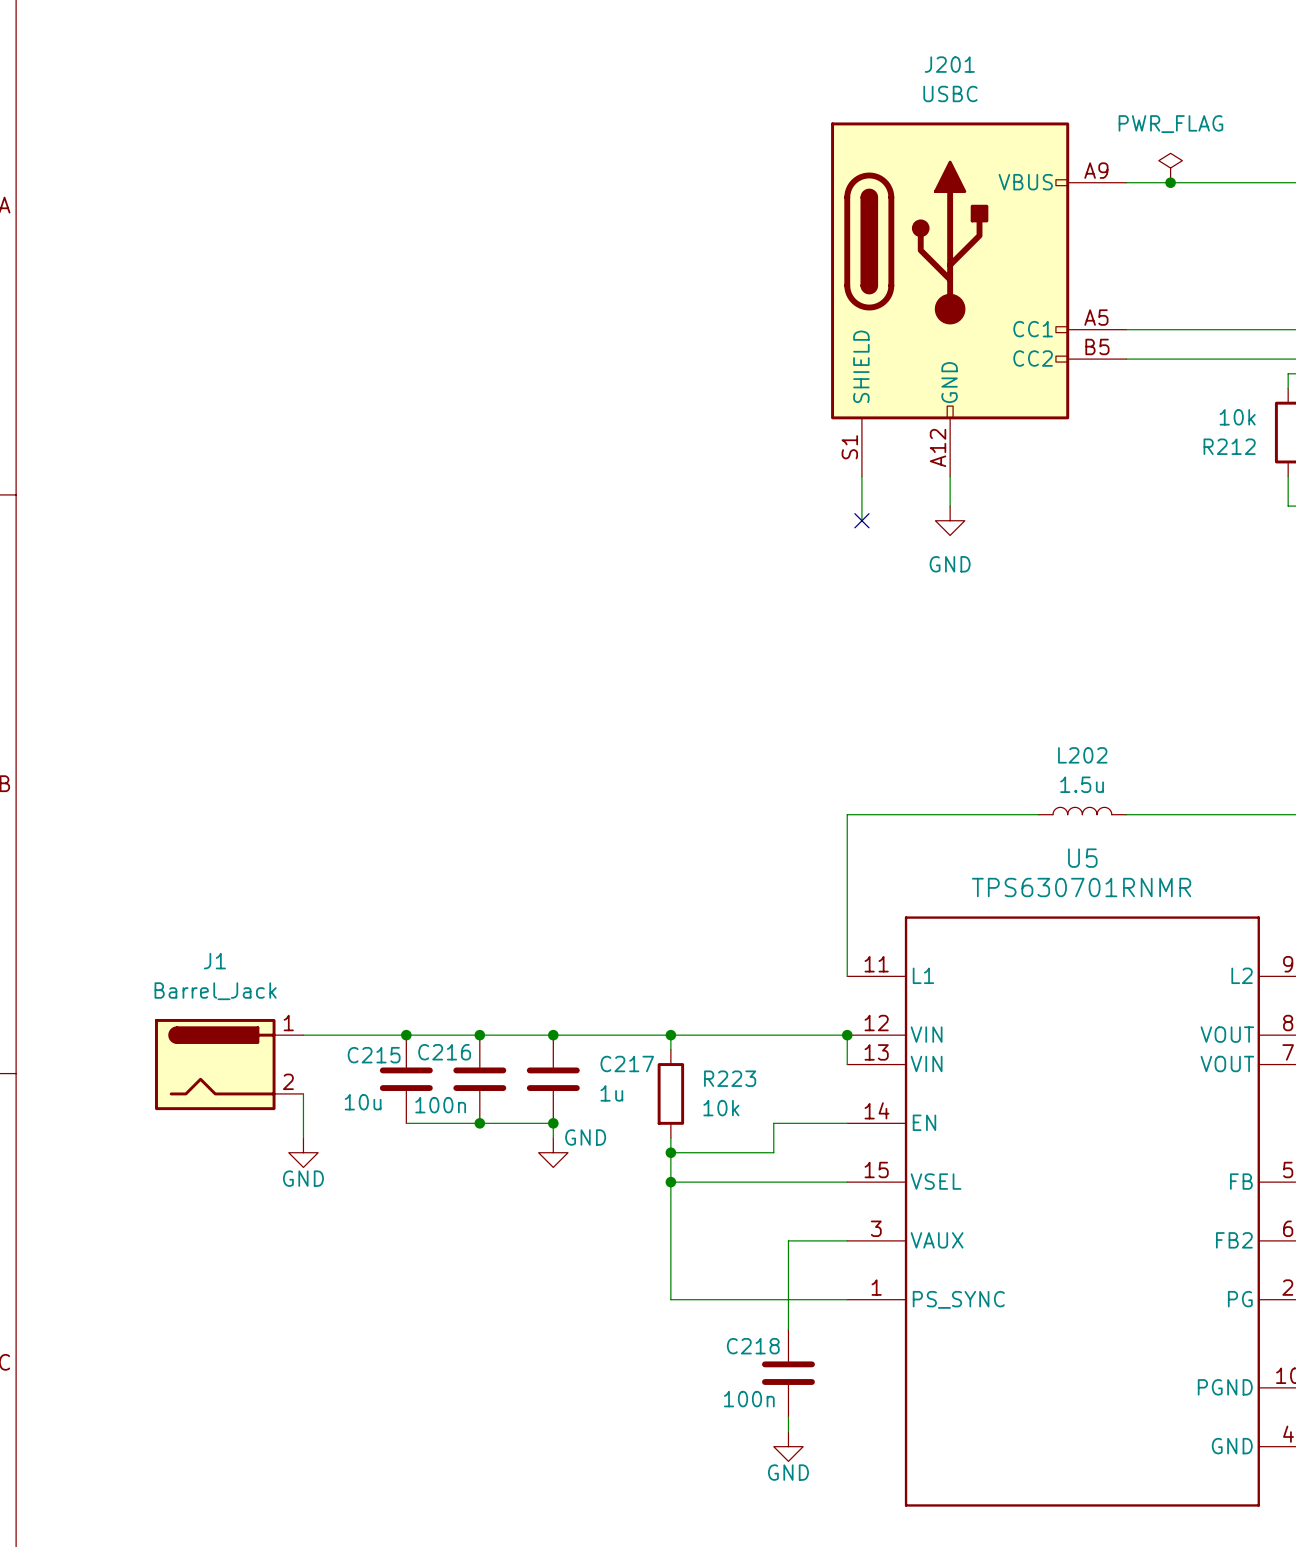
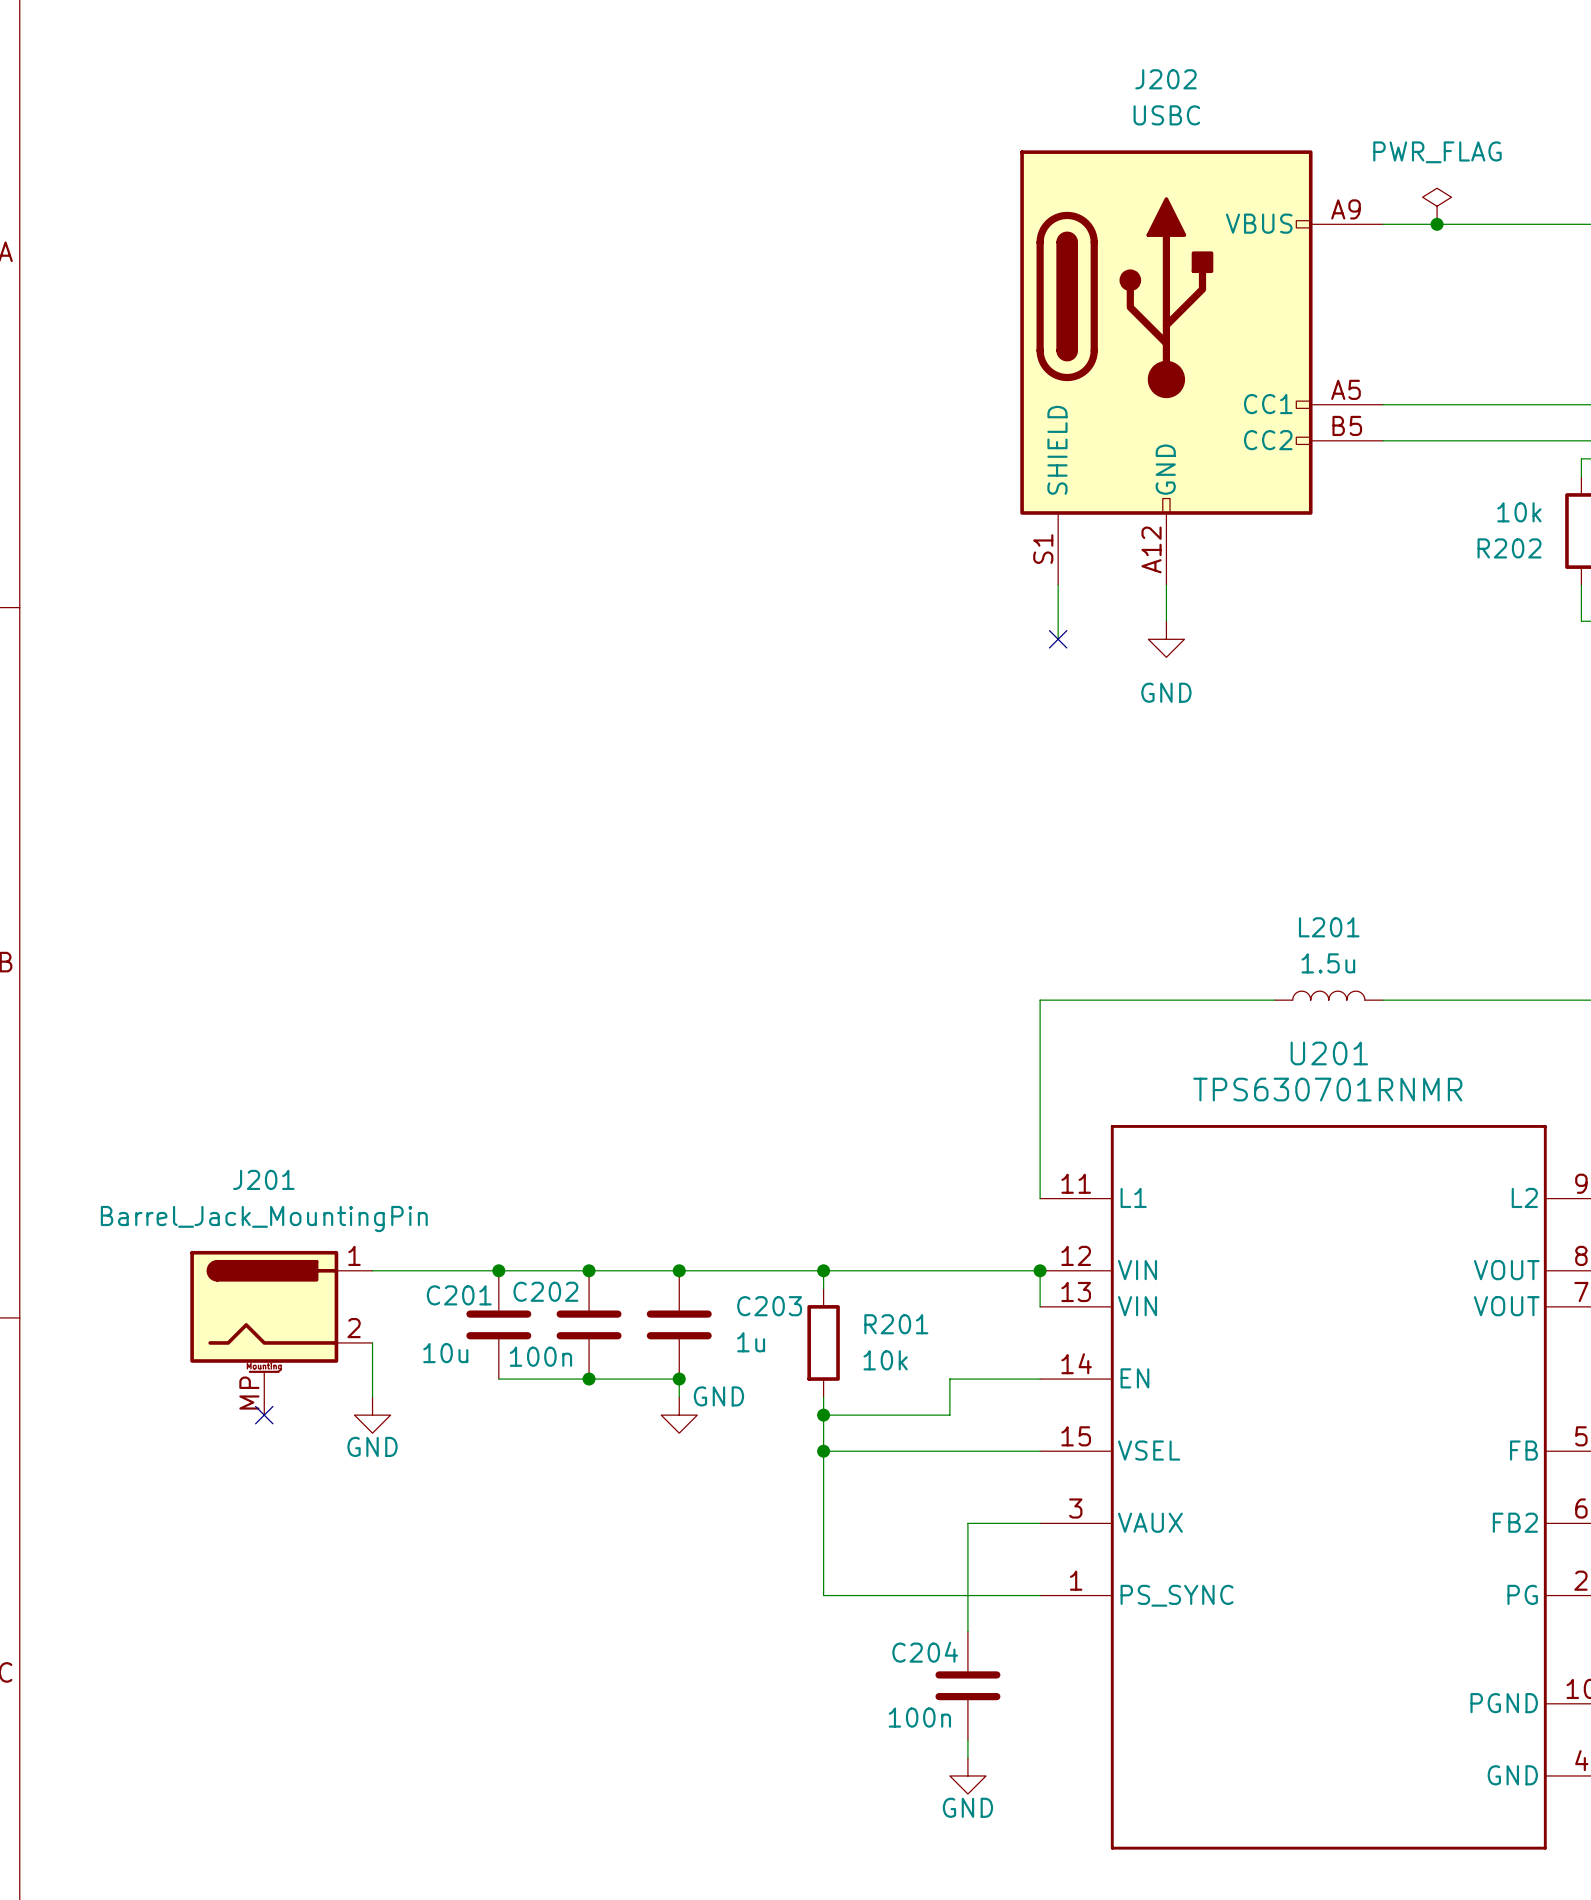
J201 name: J201 (949, 64) -> J202 (1165, 79)
R212 name: R212 (1229, 446) -> R202 (1509, 548)
L202 name: L202 (1082, 755) -> L201 (1329, 927)
U5 name: U5 (1082, 858) -> U201 (1329, 1053)
C216 name: C216 (444, 1052) -> C202 (545, 1291)
C215 name: C215 (374, 1055) -> C201 (459, 1295)
C217 name: C217 (627, 1063) -> C203 (769, 1306)
J1: Barrel_Jack (229, 1064) -> none
R223 name: R223 (730, 1078) -> R201 (896, 1324)
J201: none -> Barrel_Jack_MountingPin (281, 1333)
no-connect mark: none -> (264, 1415)
C218 name: C218 (753, 1346) -> C204 (925, 1652)

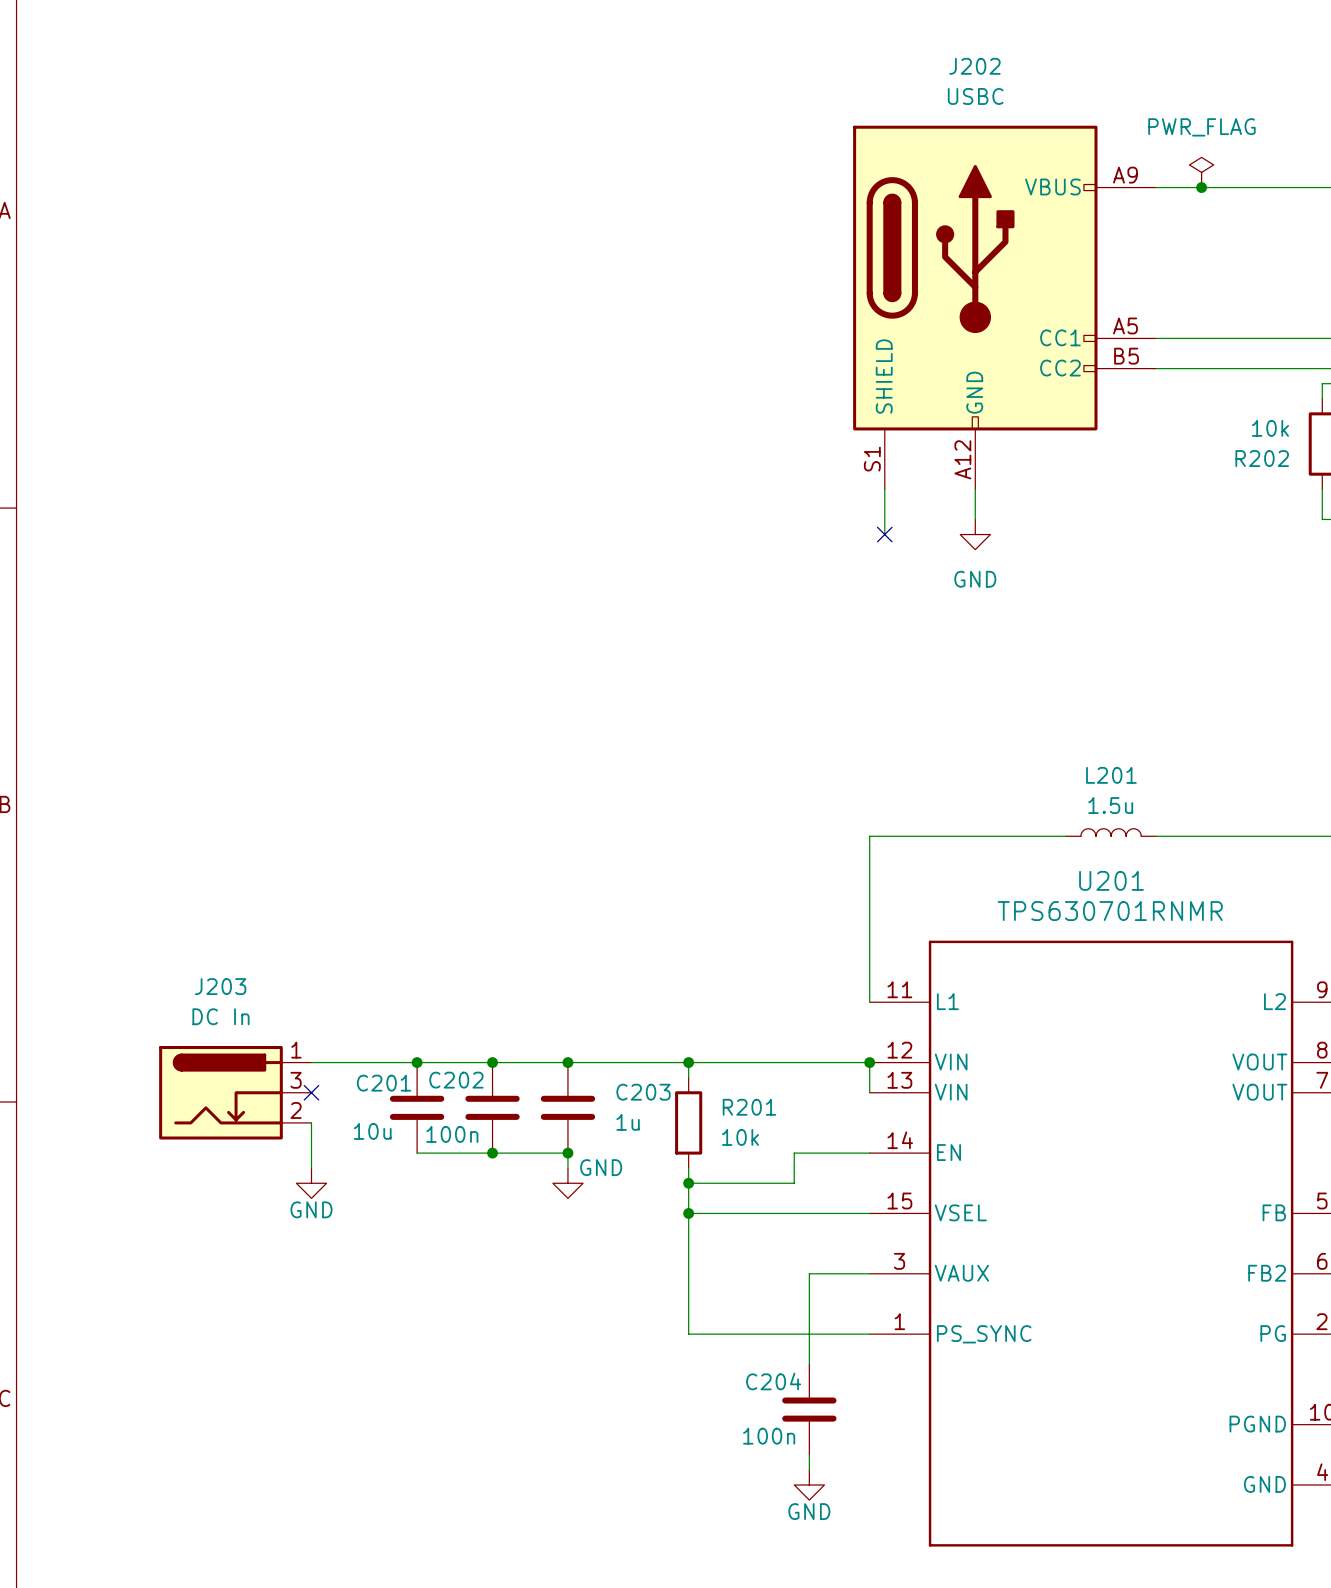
J203: none -> DC In (235, 1092)
no-connect mark: none -> (311, 1092)
J201: Barrel_Jack_MountingPin (281, 1333) -> none
no-connect mark: (264, 1415) -> none

